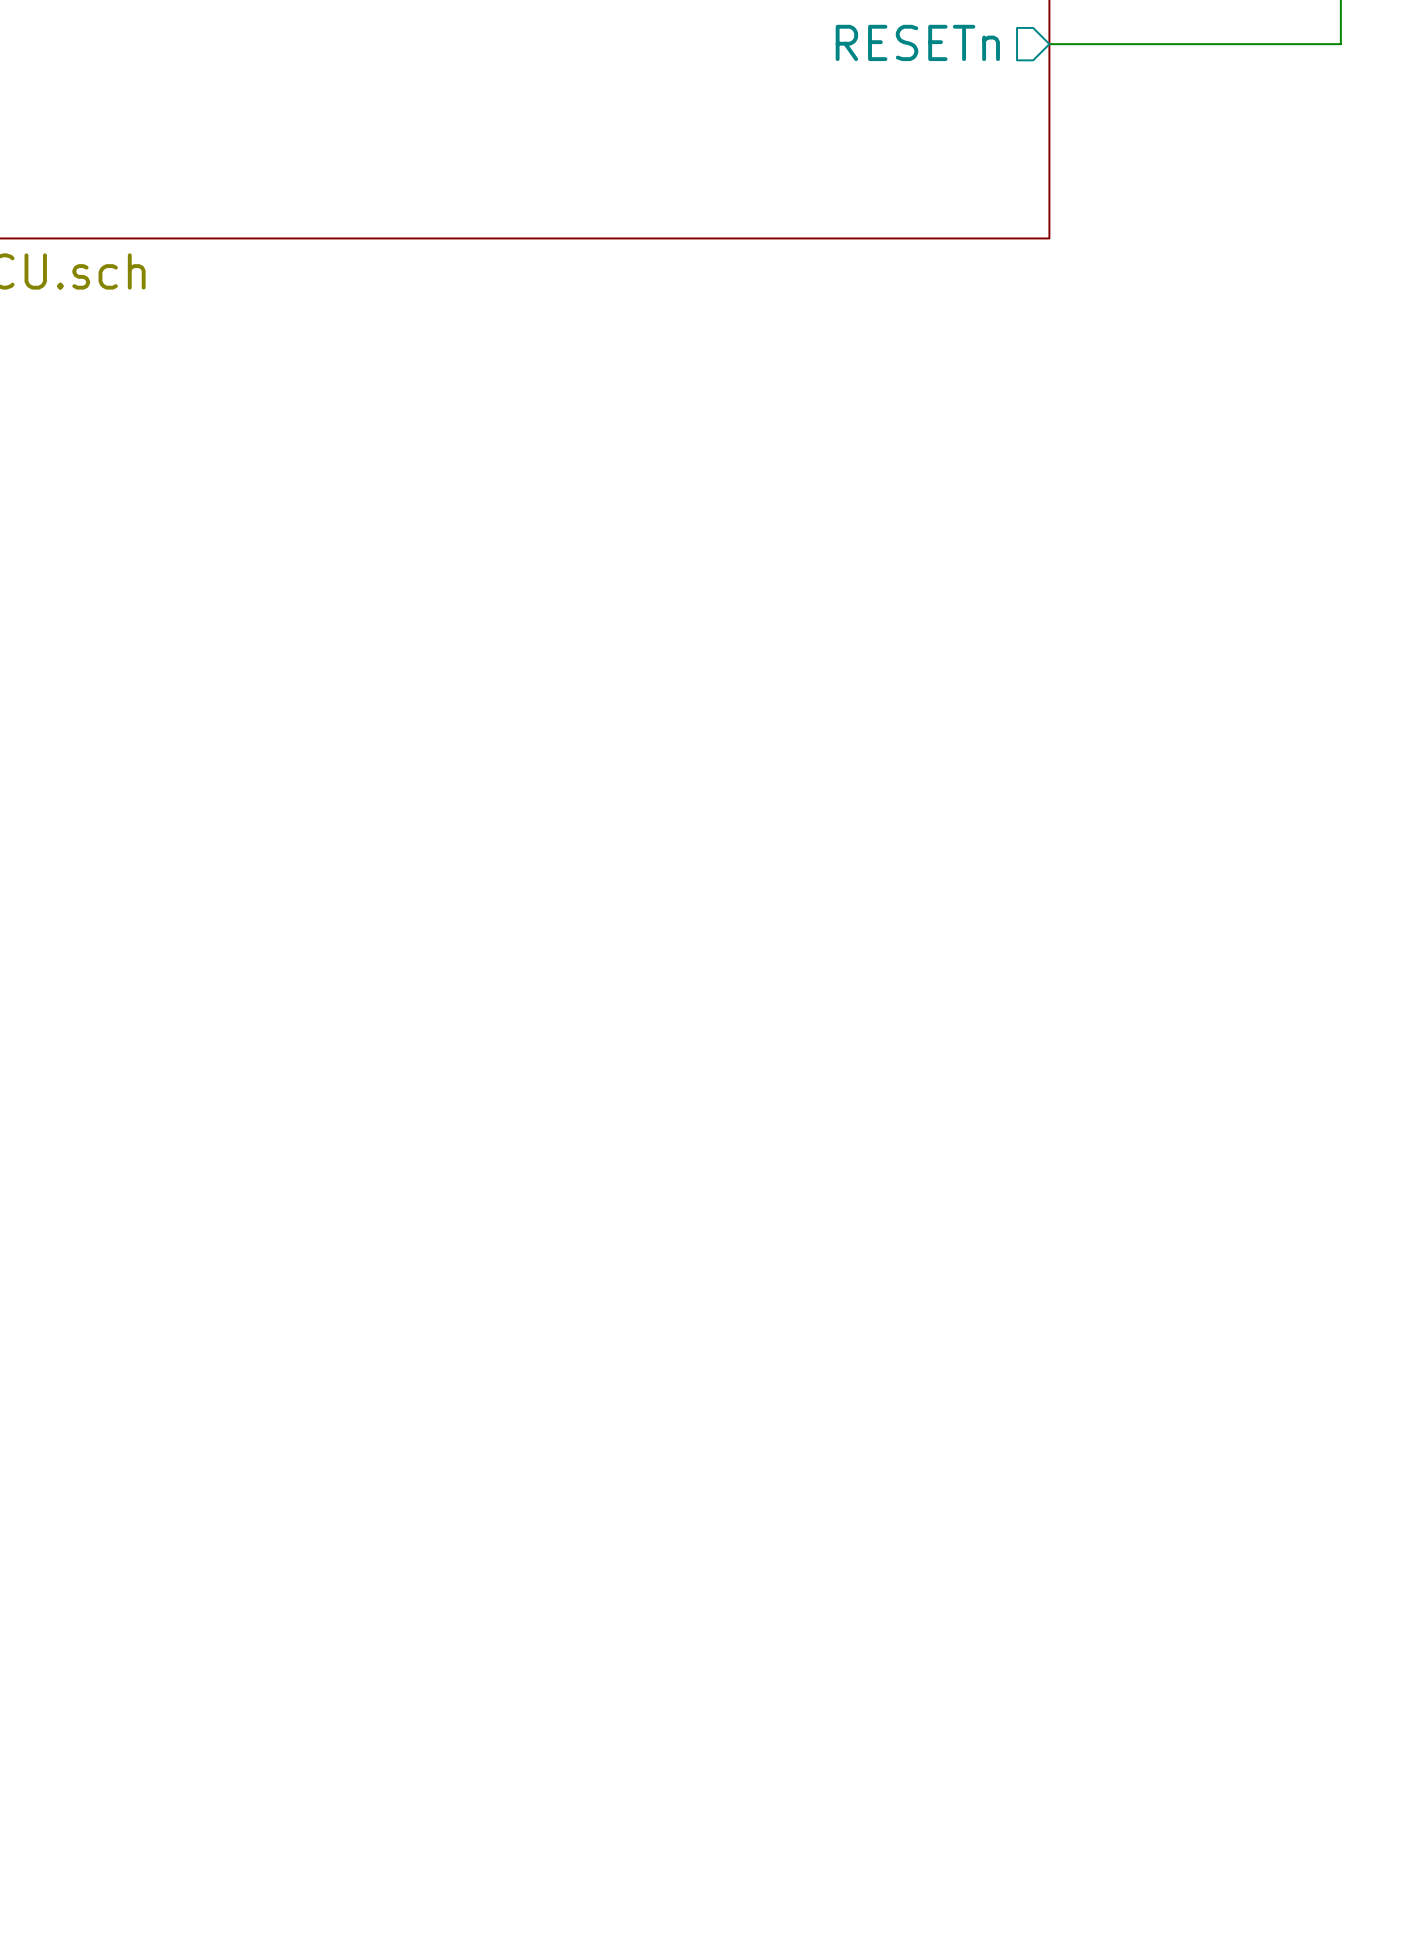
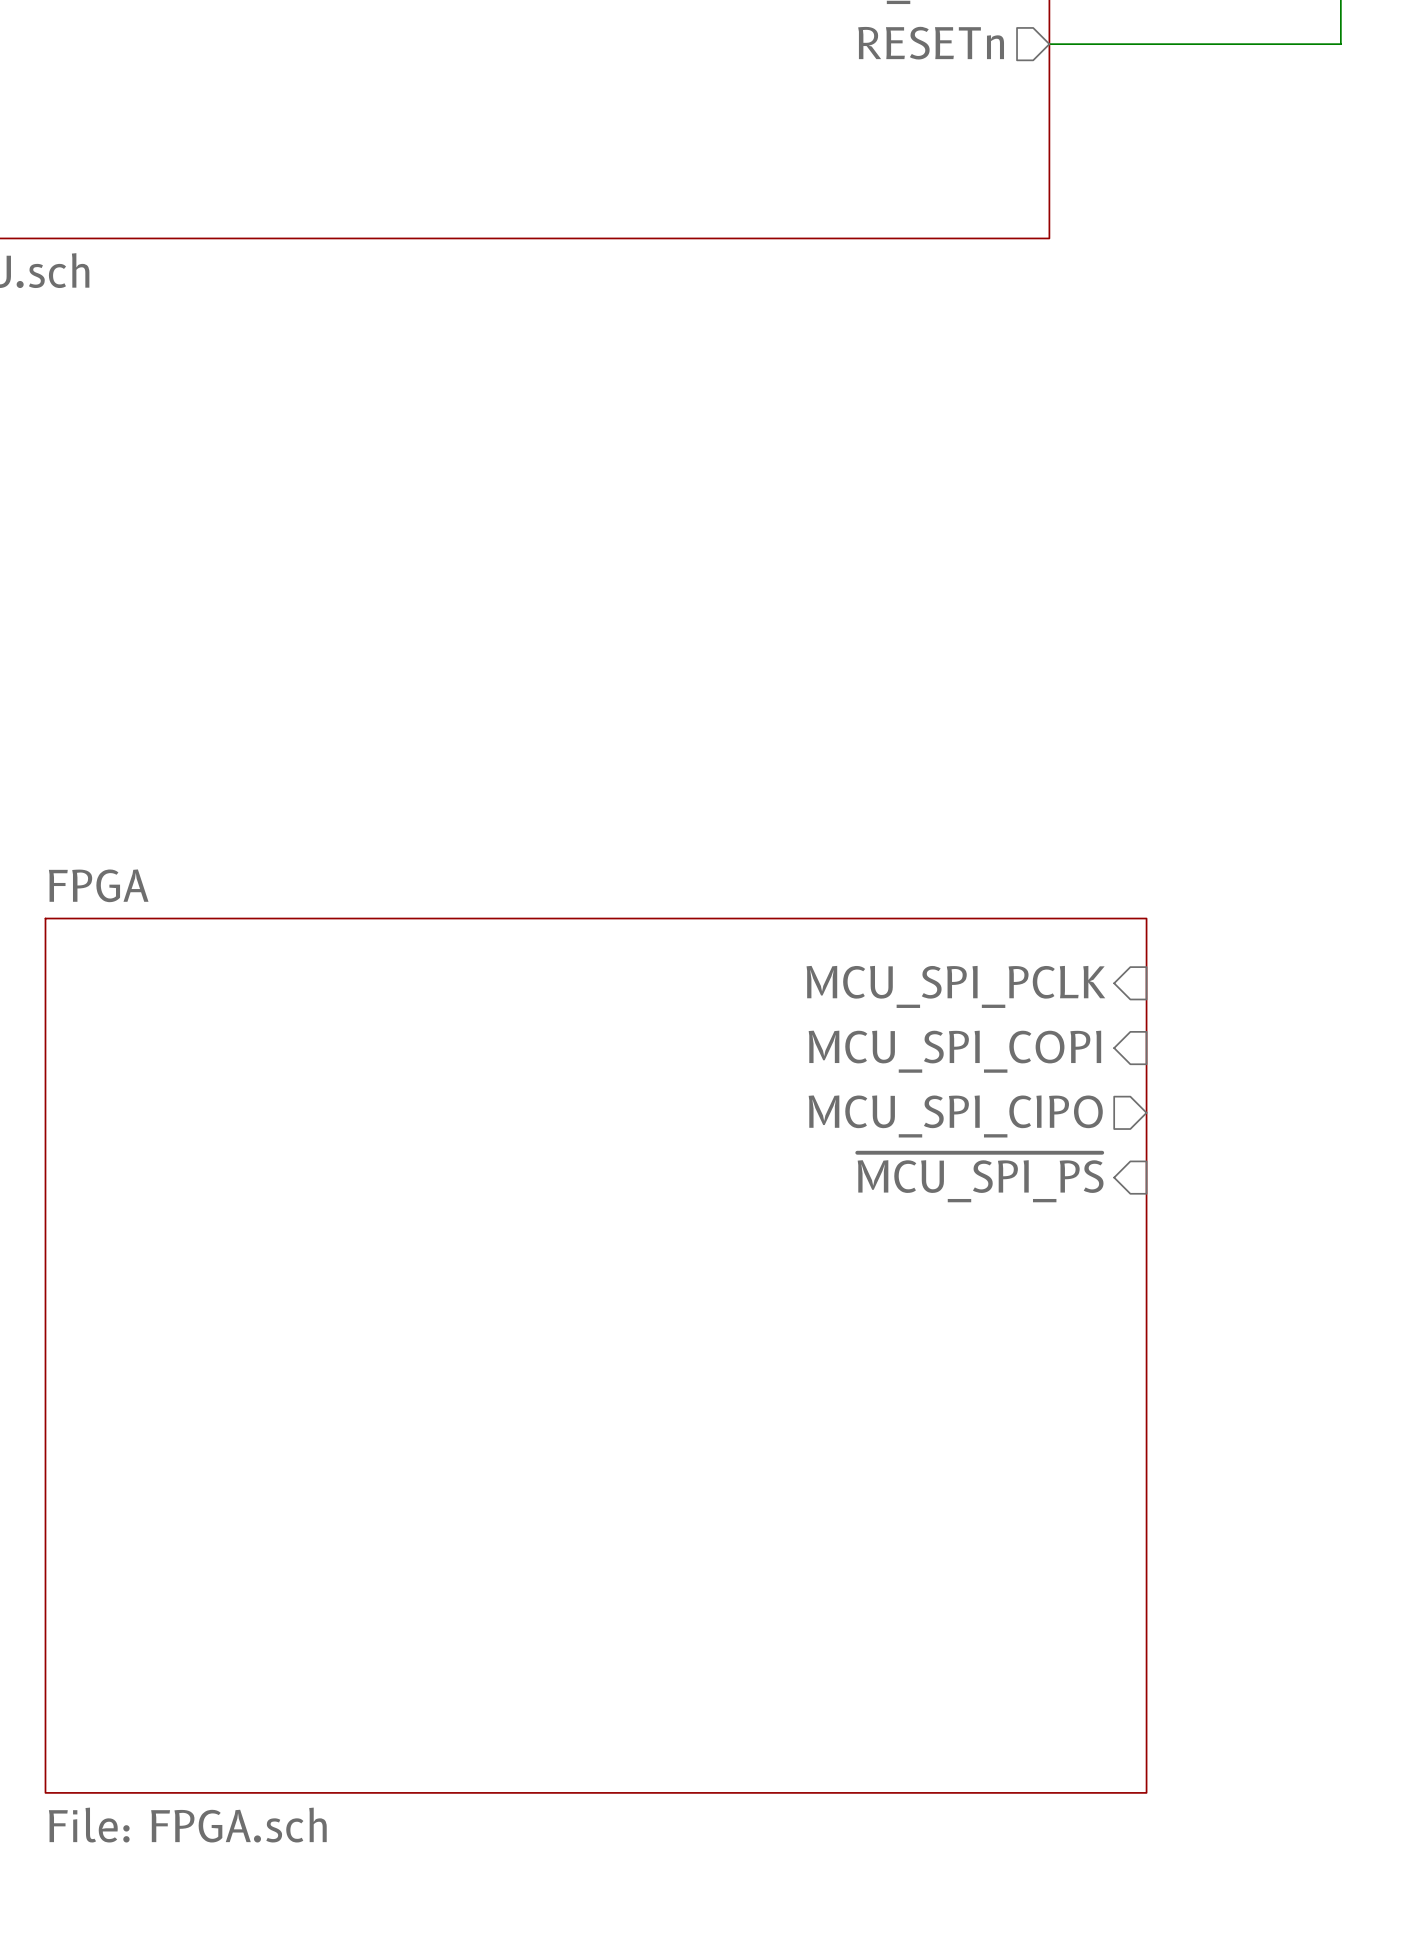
sheet pin: none -> MCU_SPI_PCLK (955, 986)
sheet pin: none -> MCU_SPI_COPI (954, 1051)
sheet pin: none -> MCU_SPI_CIPO (955, 1116)
sheet pin: none -> ~{MCU_SPI_PS} (980, 1177)
sheet FPGA: none -> File: FPGA.sch (596, 1355)

